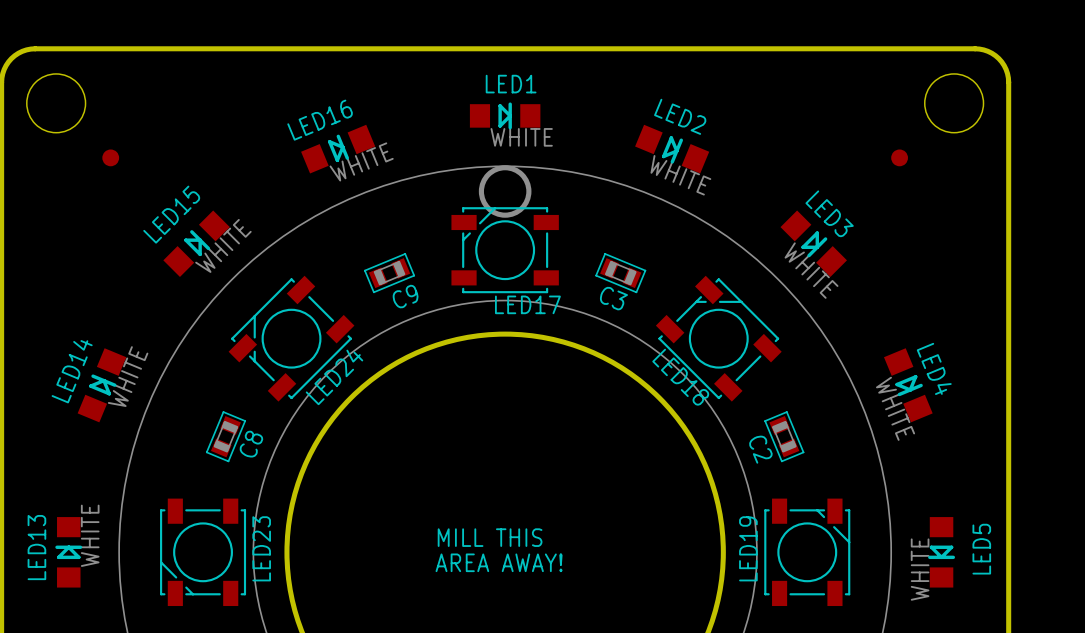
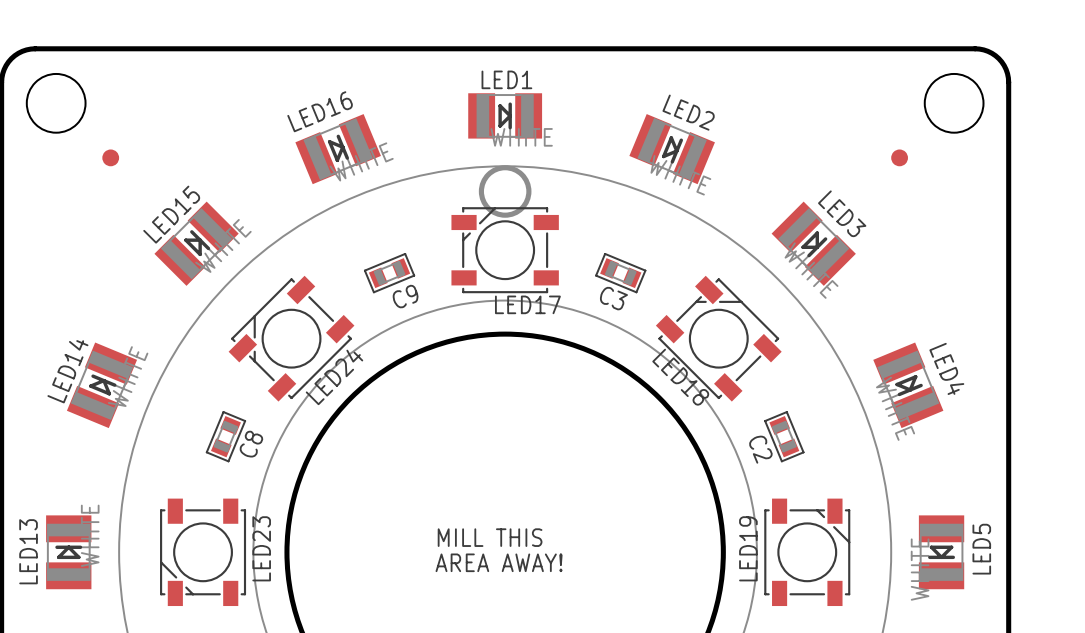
LED1 footprint: [469, 102, 541, 130] -> [468, 93, 543, 139]
LED16 footprint: [301, 124, 376, 174] -> [295, 114, 381, 185]
LED2 footprint: [635, 124, 710, 174] -> [629, 114, 715, 185]
LED15 footprint: [163, 210, 230, 277] -> [154, 201, 239, 286]
LED3 footprint: [780, 210, 847, 277] -> [771, 201, 856, 286]
LED14 footprint: [77, 348, 127, 423] -> [66, 342, 138, 429]
LED4 footprint: [883, 348, 933, 423] -> [873, 342, 944, 429]
LED13 footprint: [55, 517, 83, 588] -> [46, 515, 92, 590]
LED5 footprint: [928, 517, 956, 588] -> [918, 515, 965, 590]

